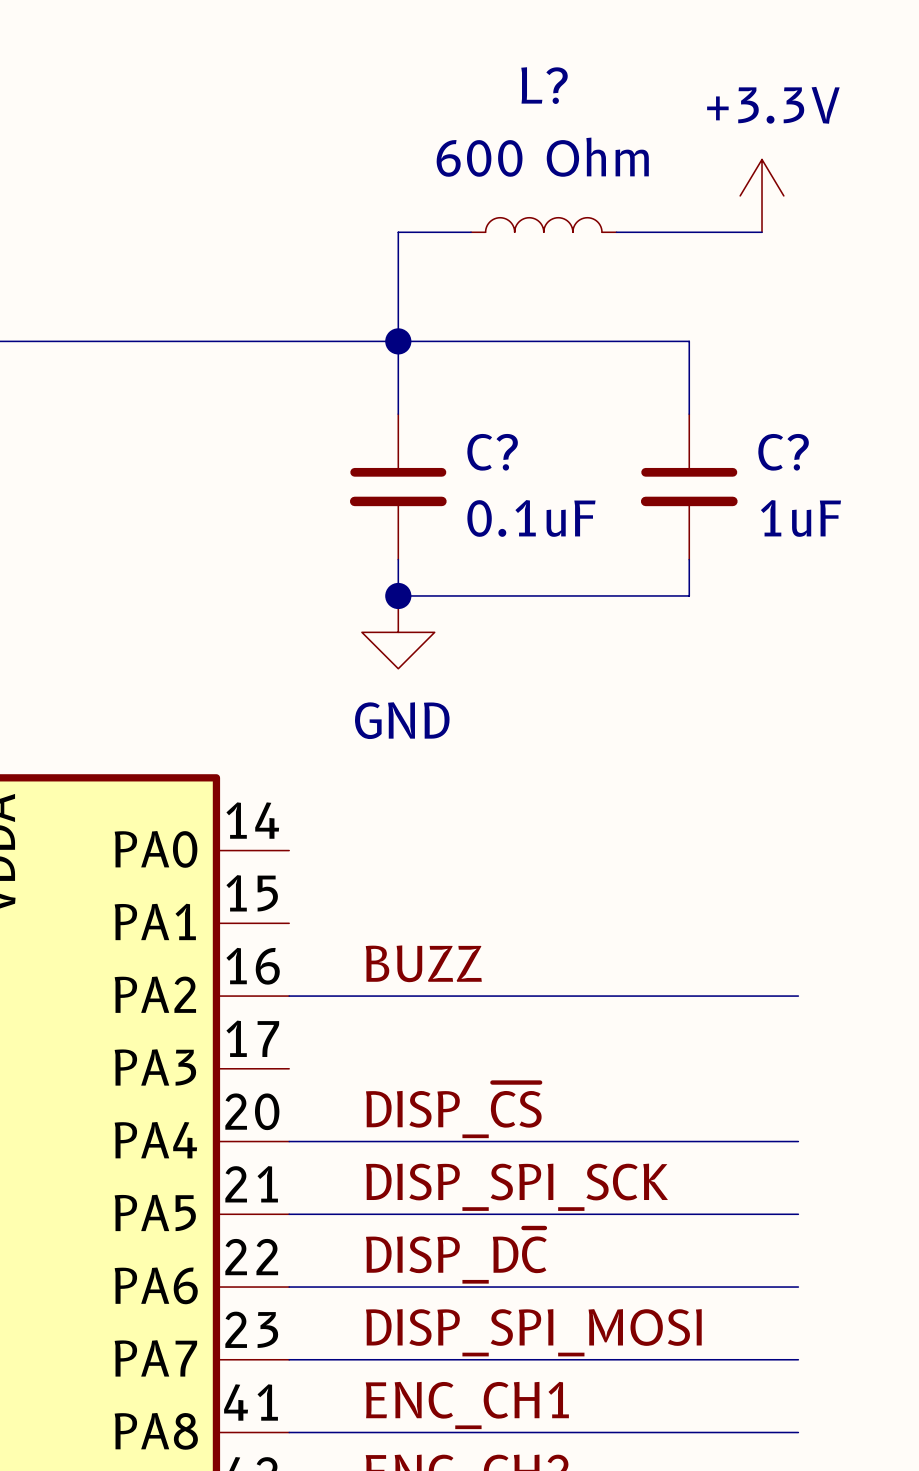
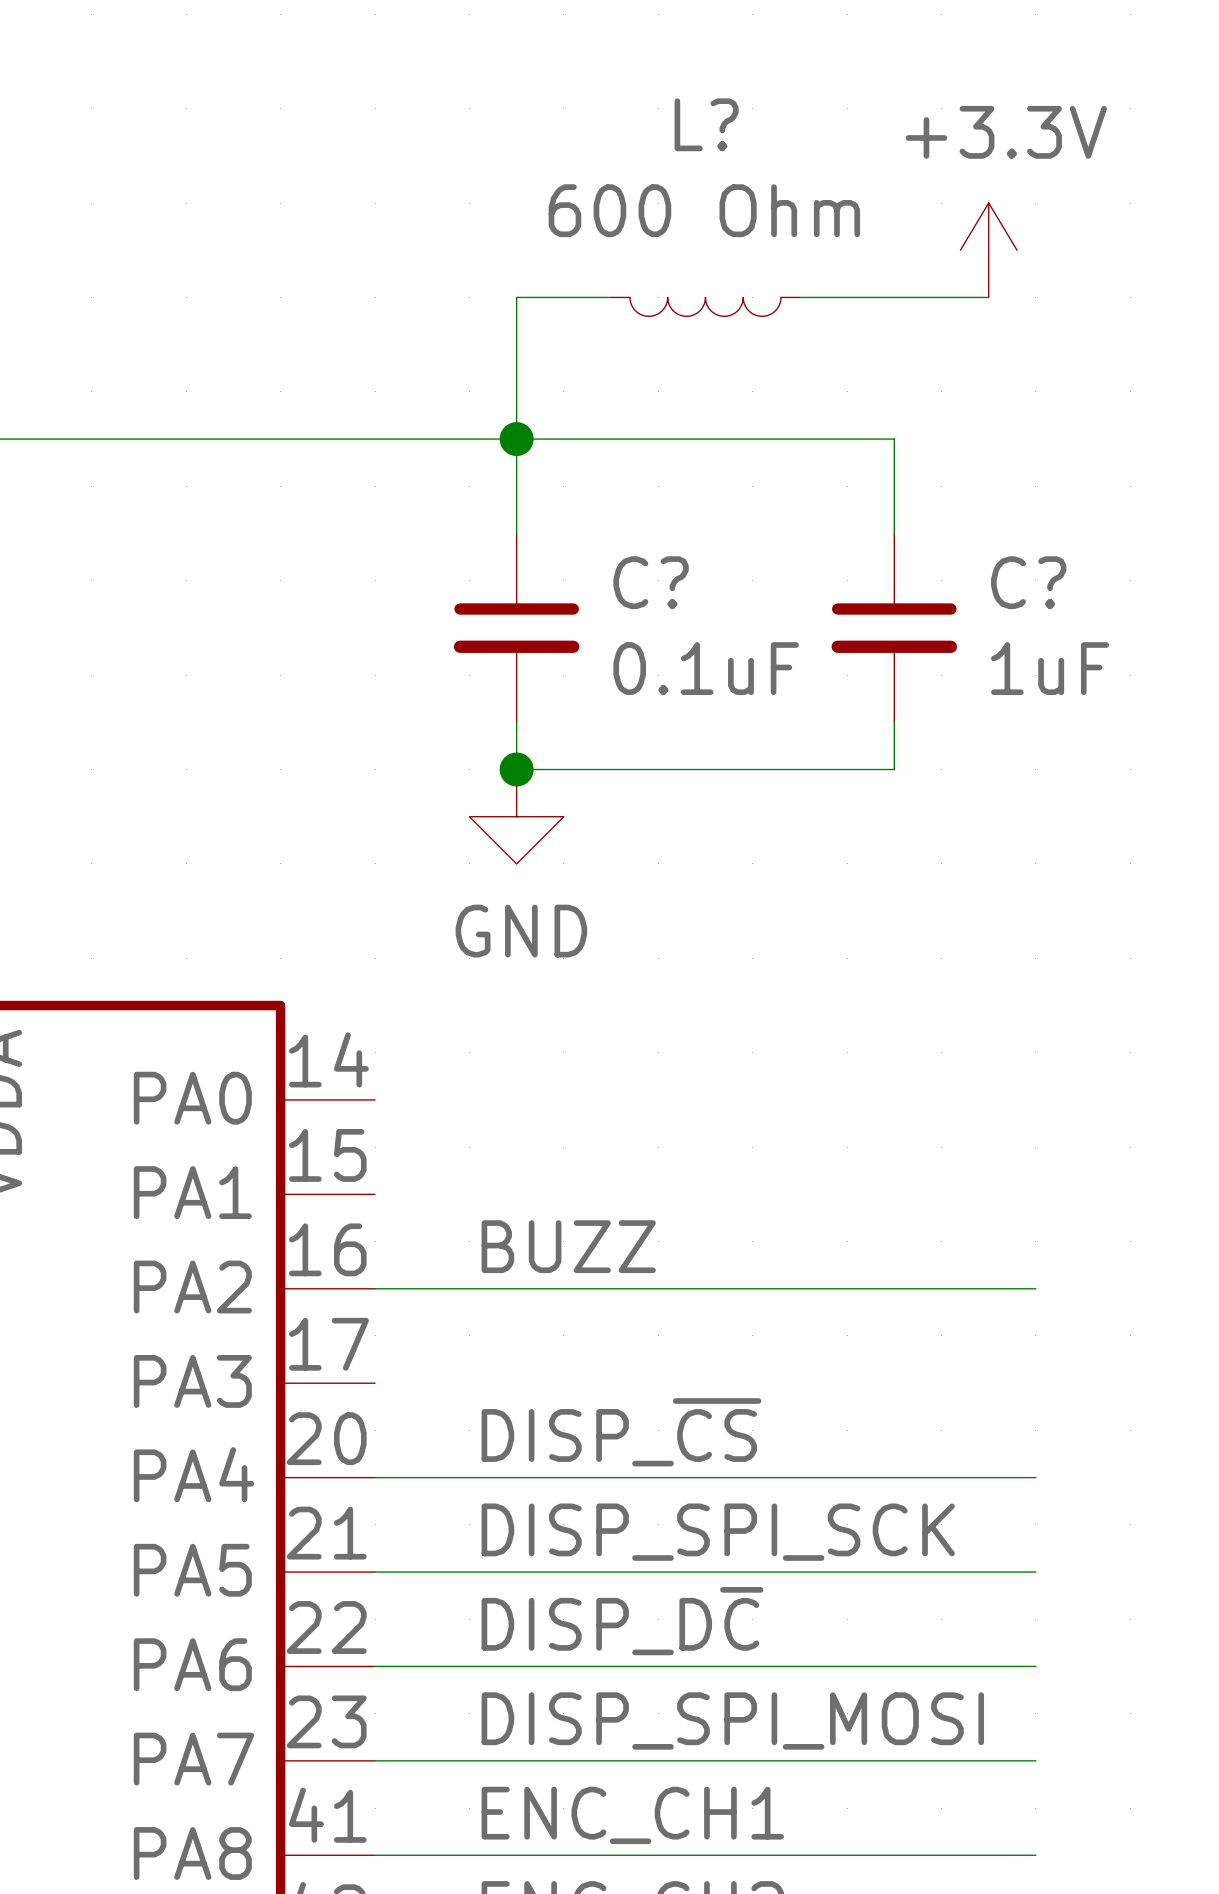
L? rotation: 0° (543, 224) -> 180° (705, 306)

